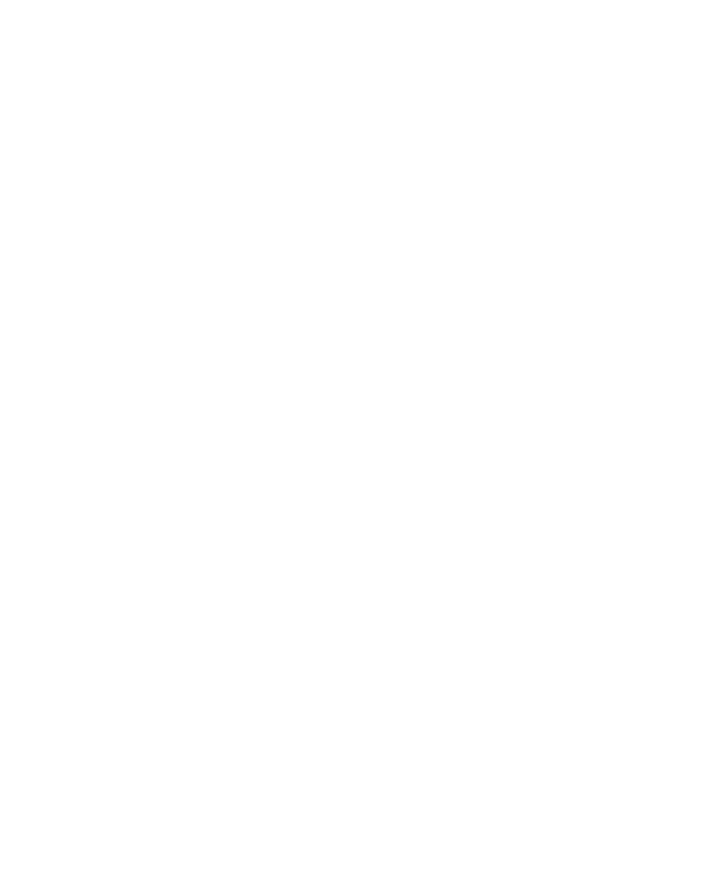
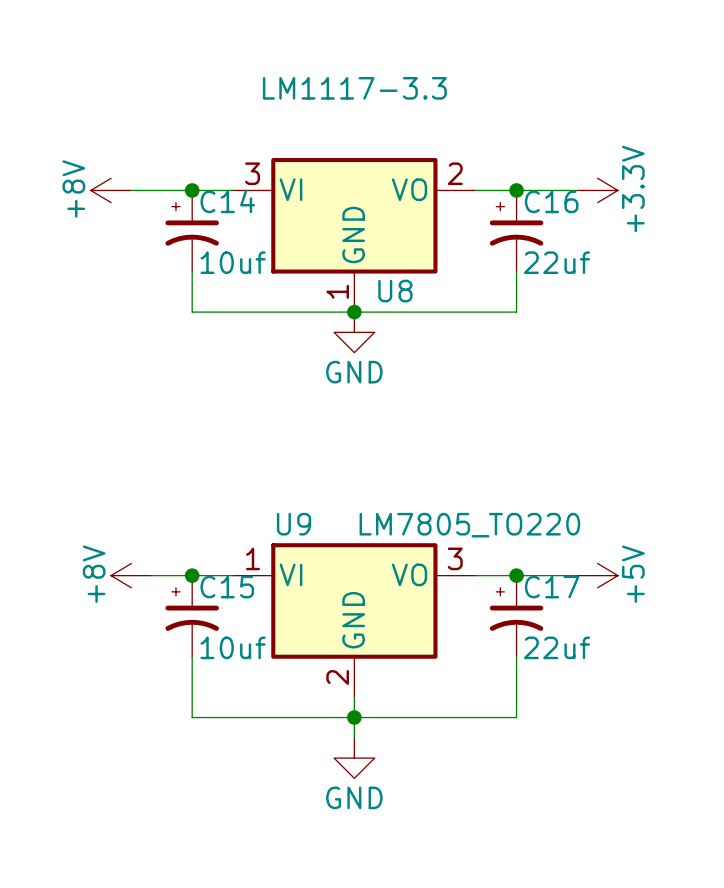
power symbol: none -> +8V (111, 190)
wire: none -> (131, 190) (232, 190)
junction: none -> (192, 190)
wire: none -> (476, 190) (577, 190)
junction: none -> (516, 190)
power symbol: none -> +3.3V (597, 190)
C14: none -> 10uf (192, 230)
C16: none -> 22uf (516, 230)
U8: none -> LM1117-3.3 (354, 235)
wire: none -> (192, 271) (192, 312) (516, 312) (516, 271)
junction: none -> (354, 312)
power symbol: none -> GND (354, 332)
power symbol: none -> +8V (131, 575)
wire: none -> (151, 575) (232, 575)
junction: none -> (192, 575)
wire: none -> (476, 575) (577, 575)
junction: none -> (516, 575)
power symbol: none -> +5V (597, 575)
C15: none -> 10uf (192, 616)
C17: none -> 22uf (516, 616)
U9: none -> LM7805_TO220 (354, 620)
wire: none -> (192, 656) (192, 717) (516, 717) (516, 656)
wire: none -> (354, 697) (354, 737)
junction: none -> (354, 717)
power symbol: none -> GND (354, 758)

